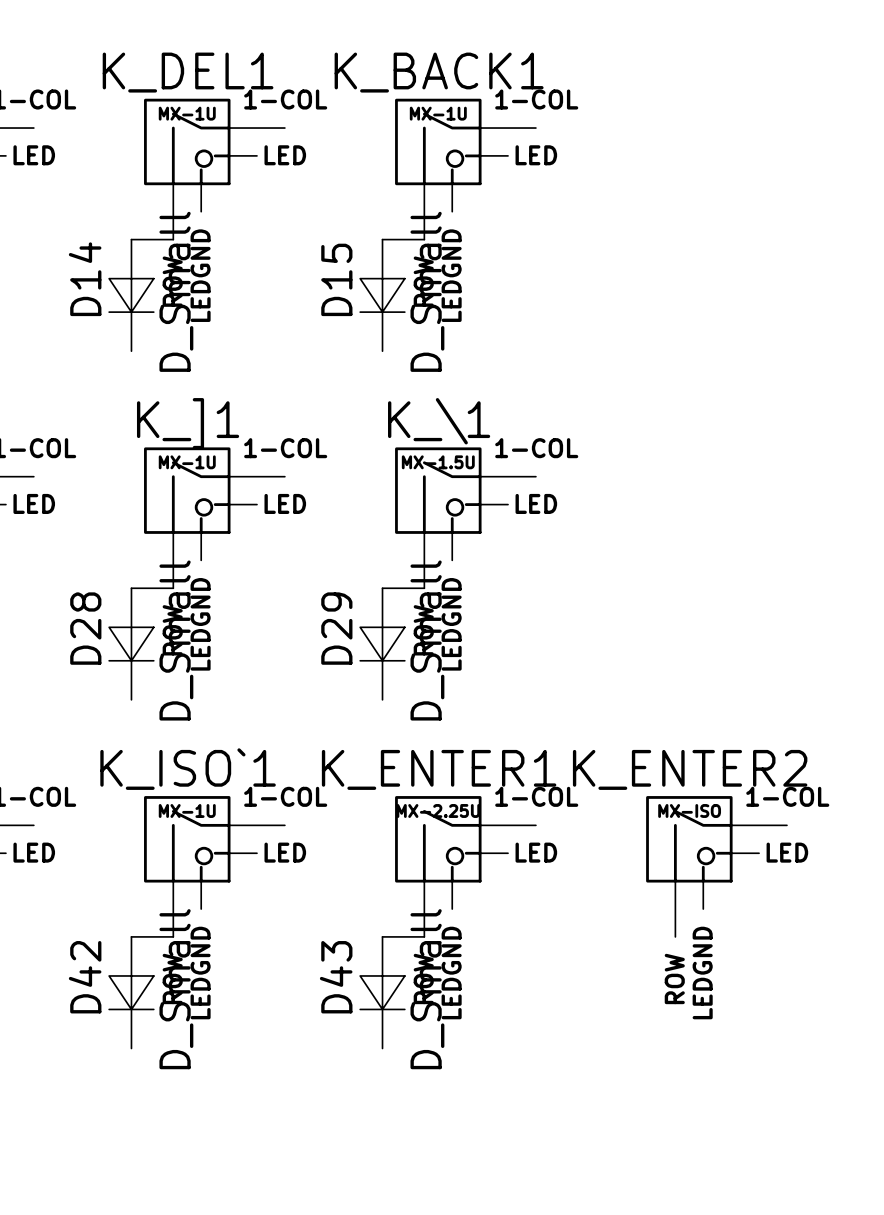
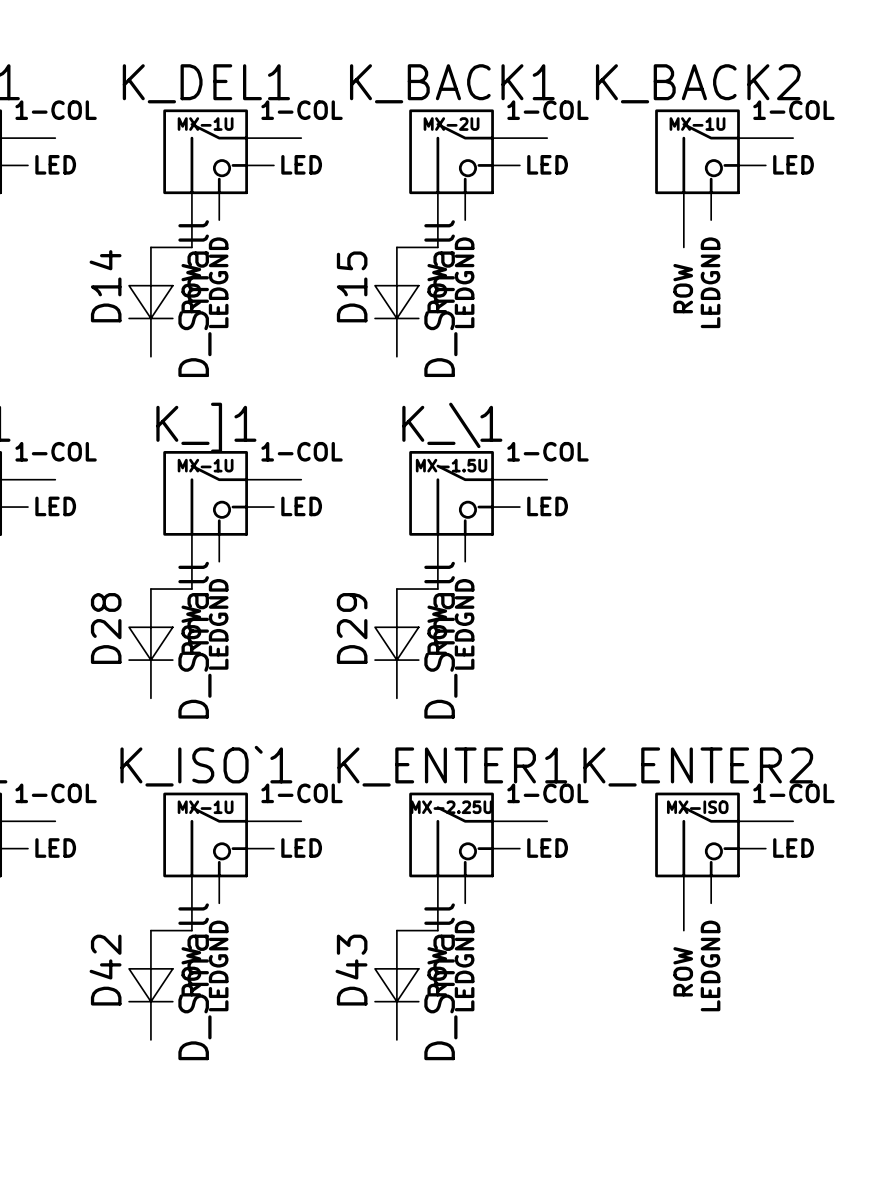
K_BACK1 value: MX-1U (438, 113) -> MX-2U (451, 124)
K_BACK2: none -> MX-1U (724, 178)

